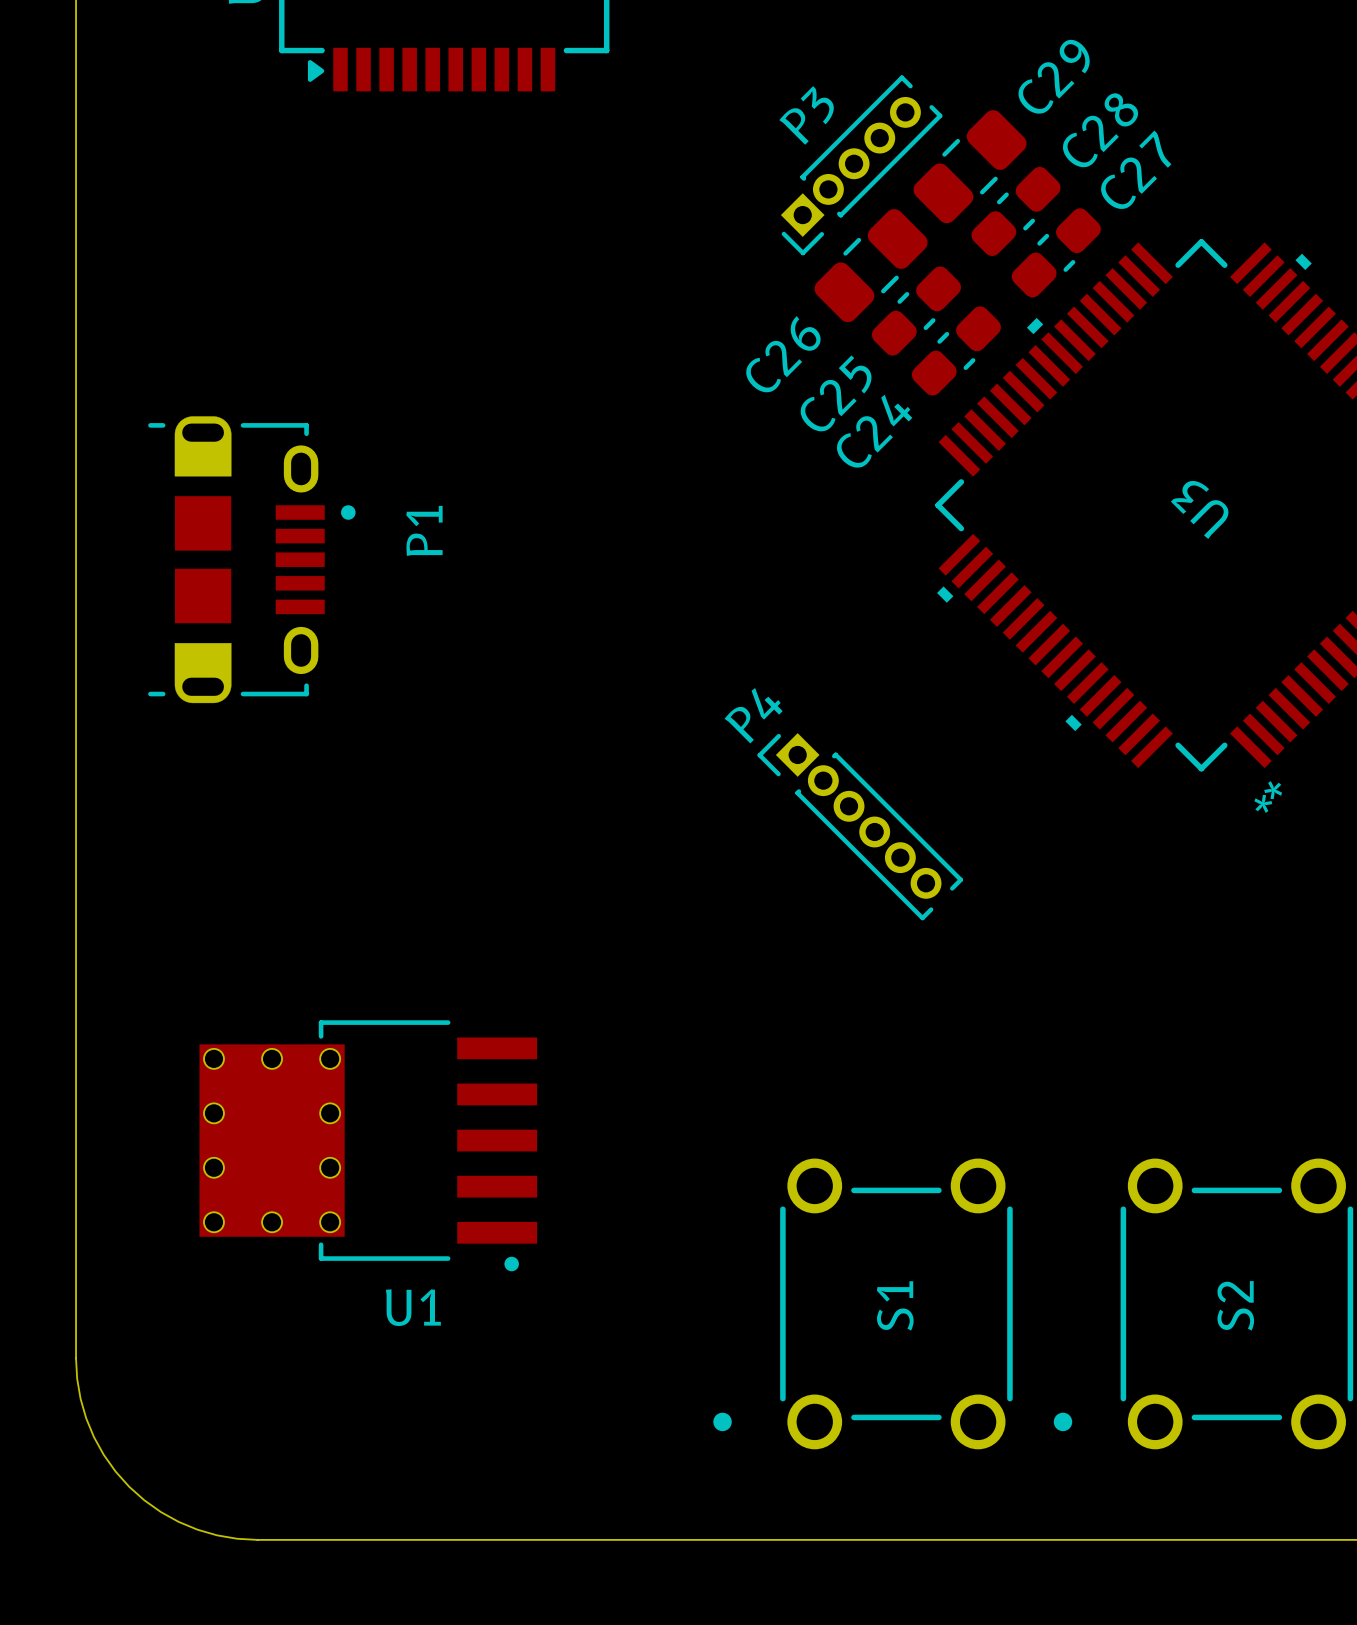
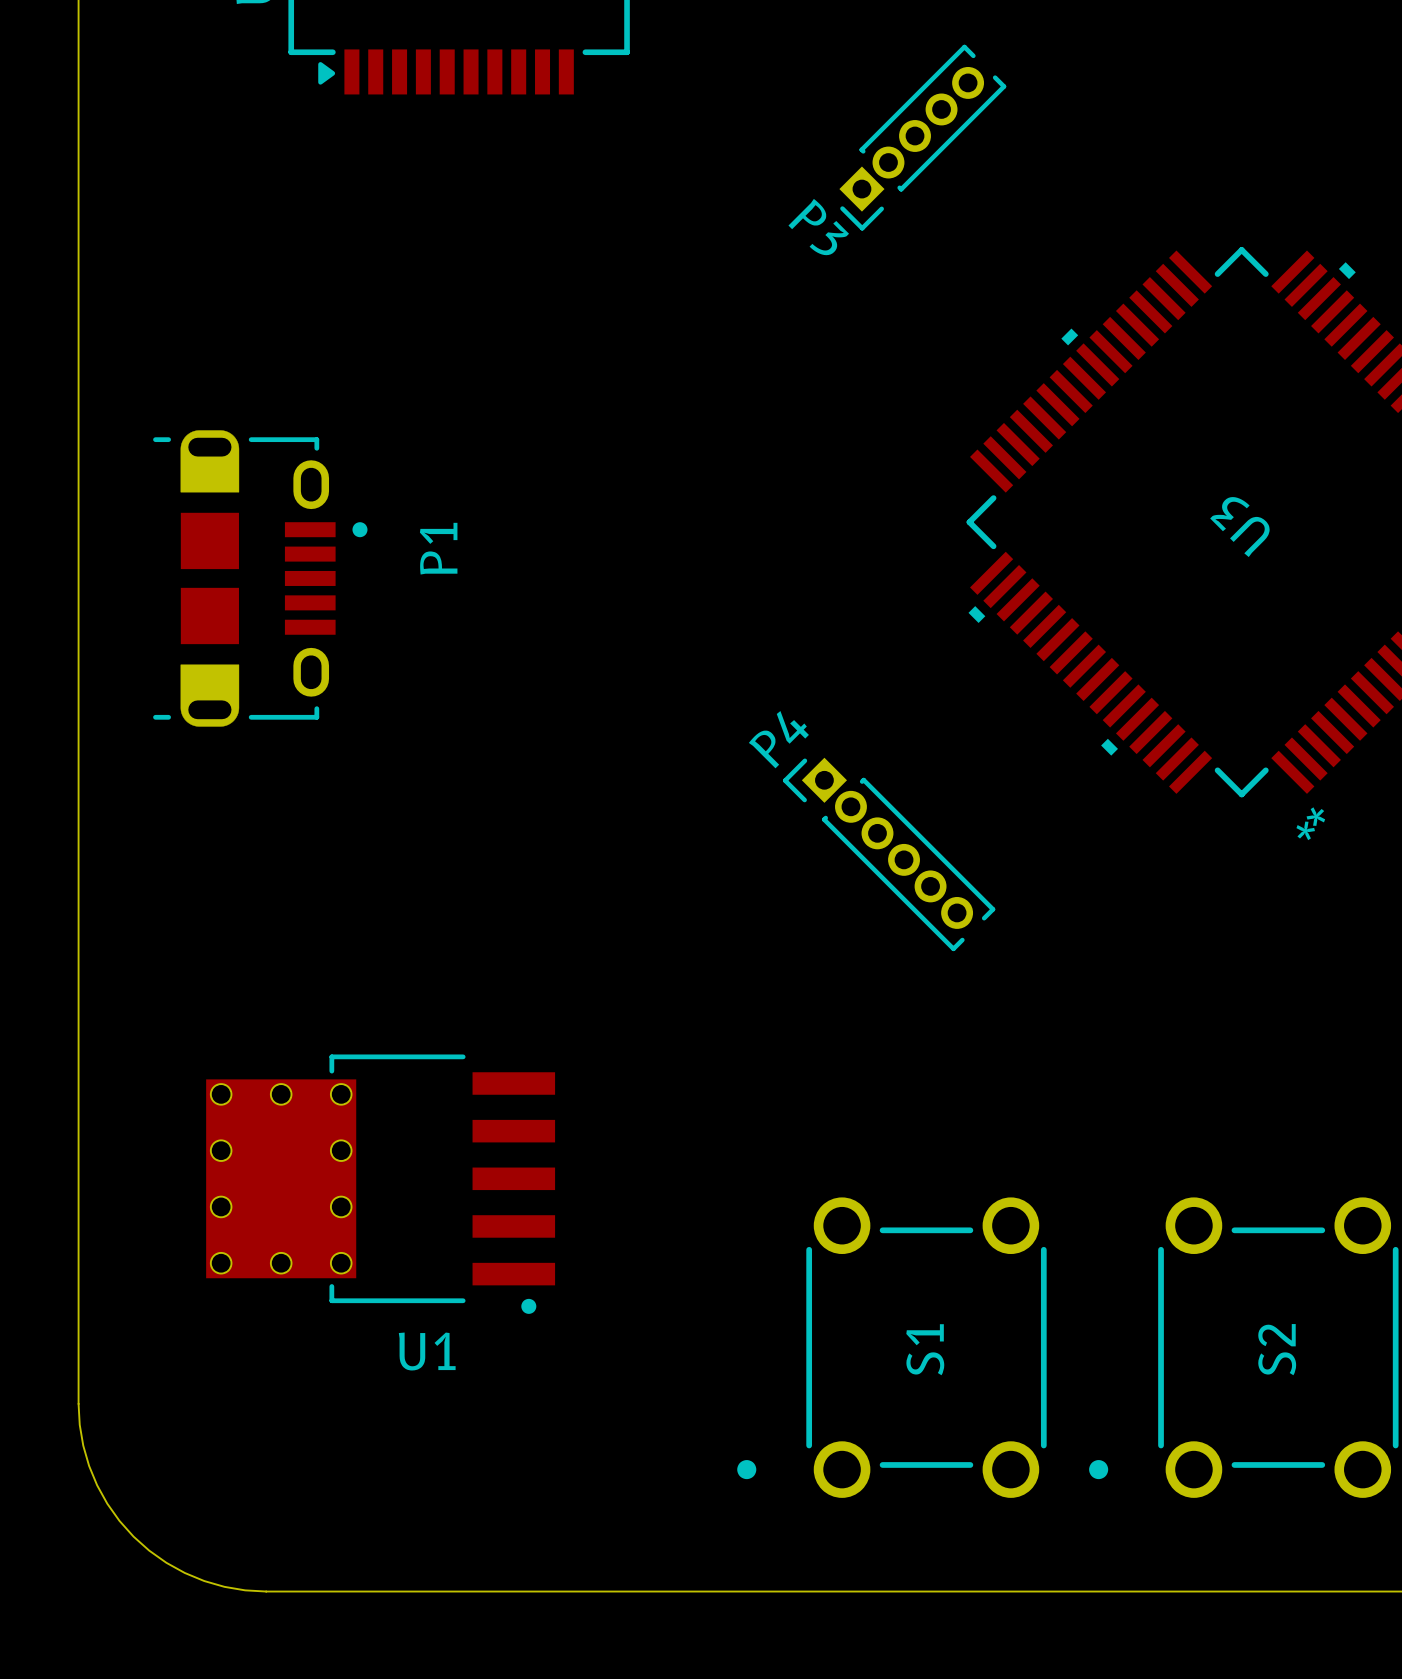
P3 name rotation: 0° (806, 115) -> 90° clockwise (818, 227)
P3 position: (861, 165) -> (922, 137)
C29: (970, 166) -> none
C28: (1016, 211) -> none
C27: (1056, 252) -> none
C26: (871, 265) -> none
C25: (916, 311) -> none
C24: (956, 350) -> none

